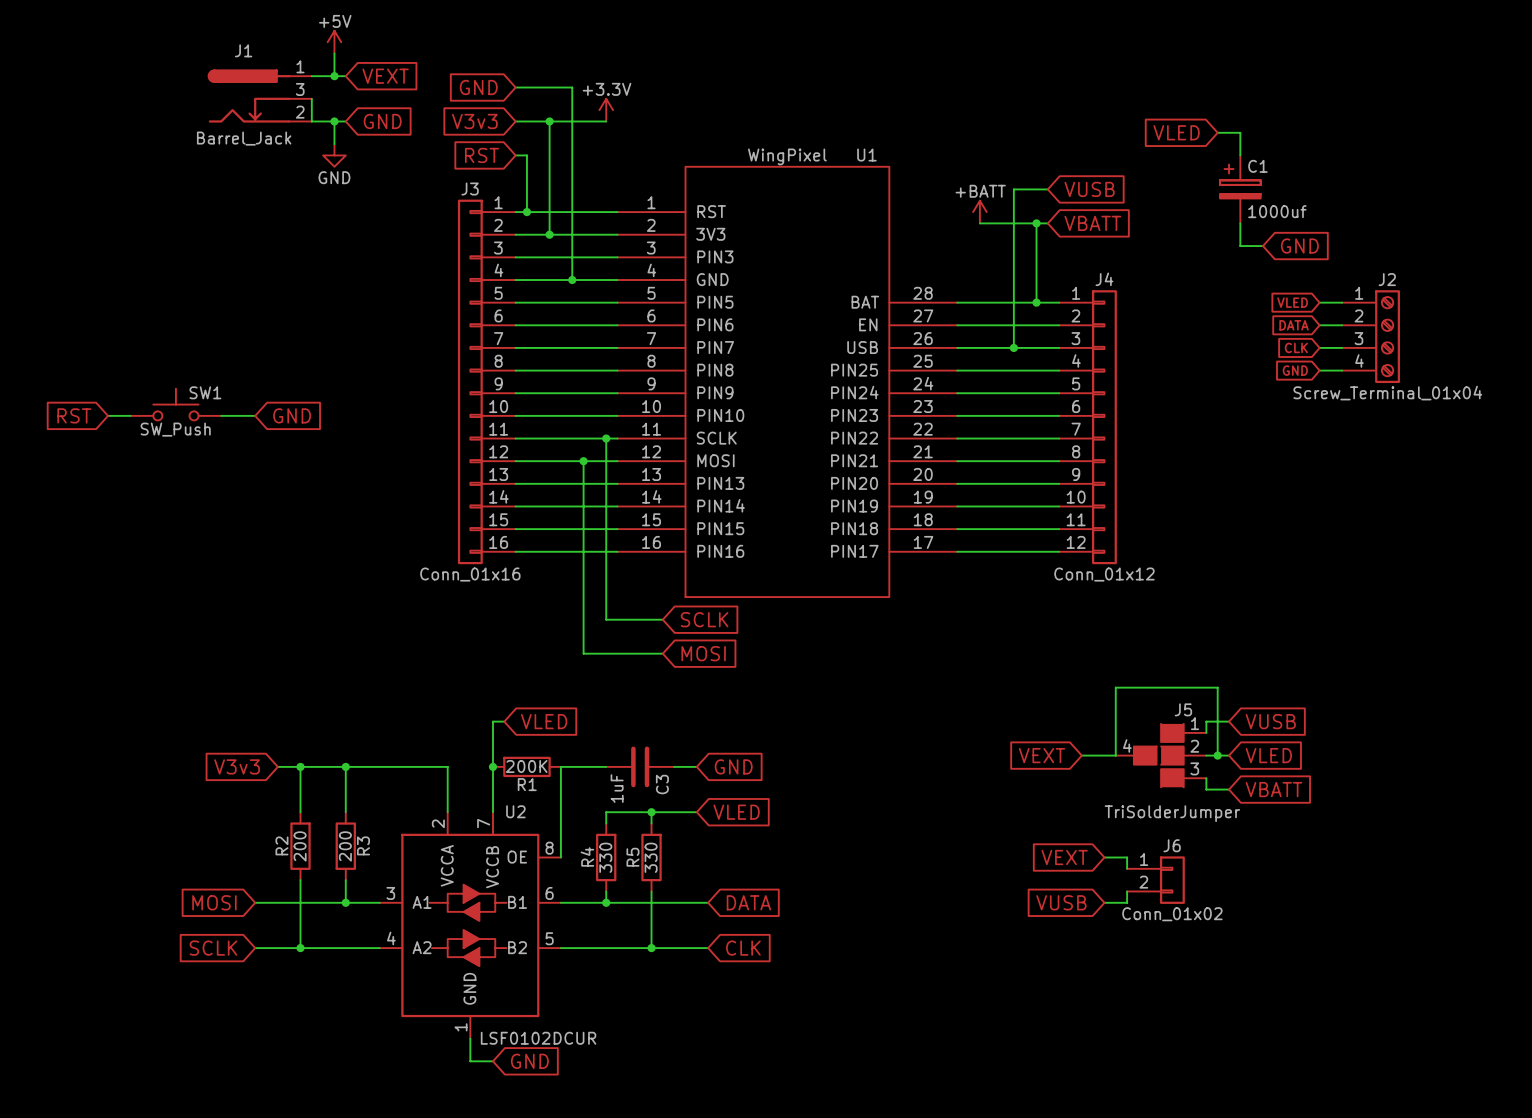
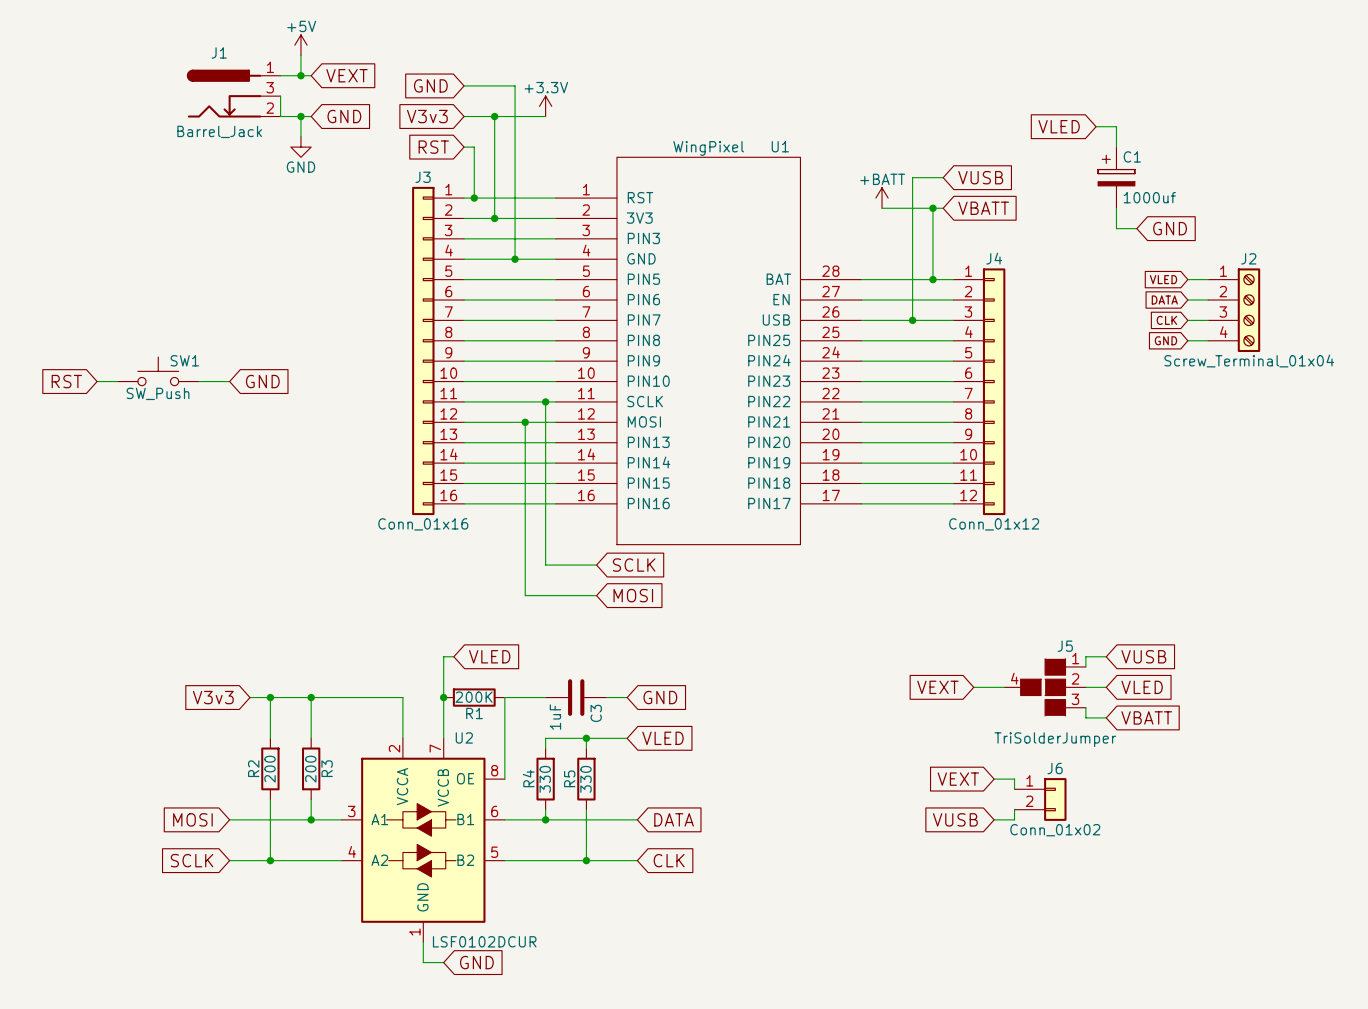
wire: (1115, 755) (1115, 687) (1217, 687) (1217, 755) -> none
junction: (1217, 755) -> none

